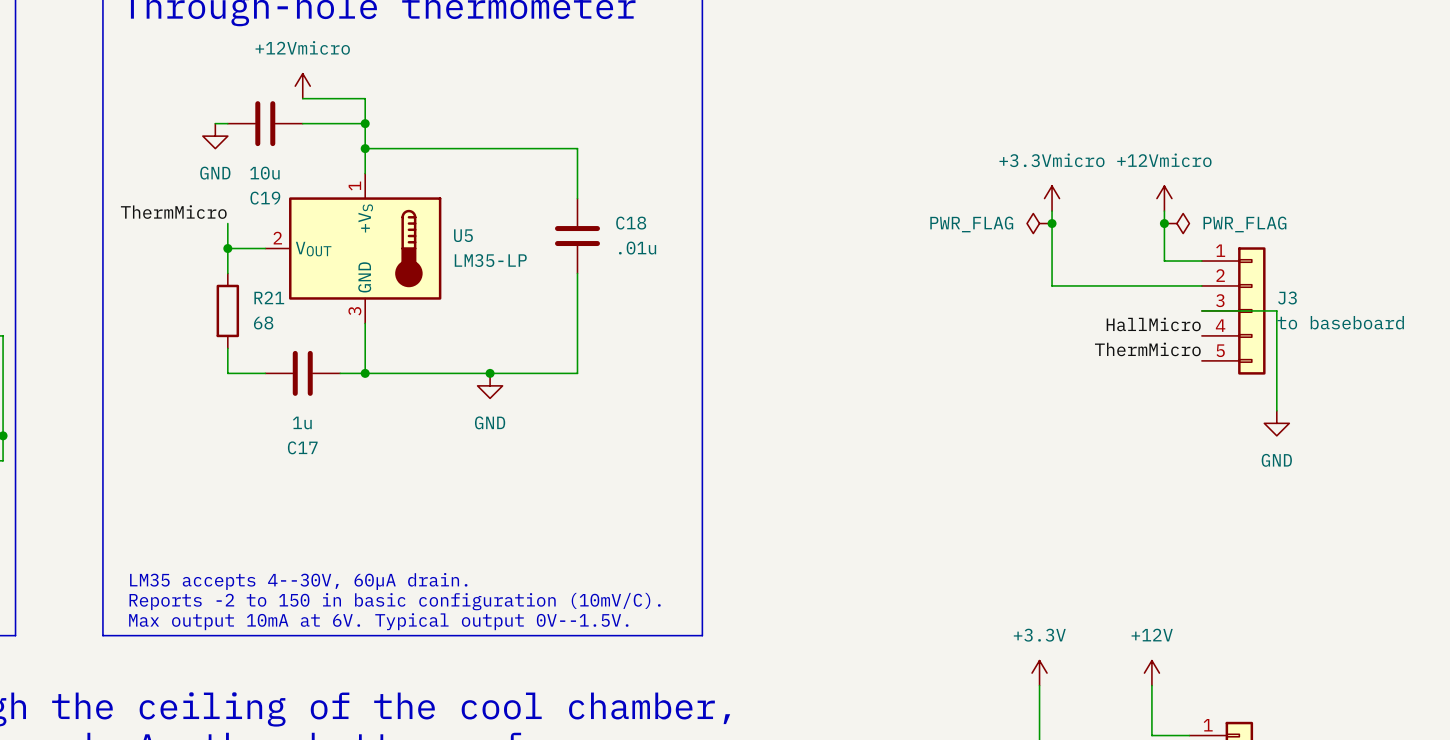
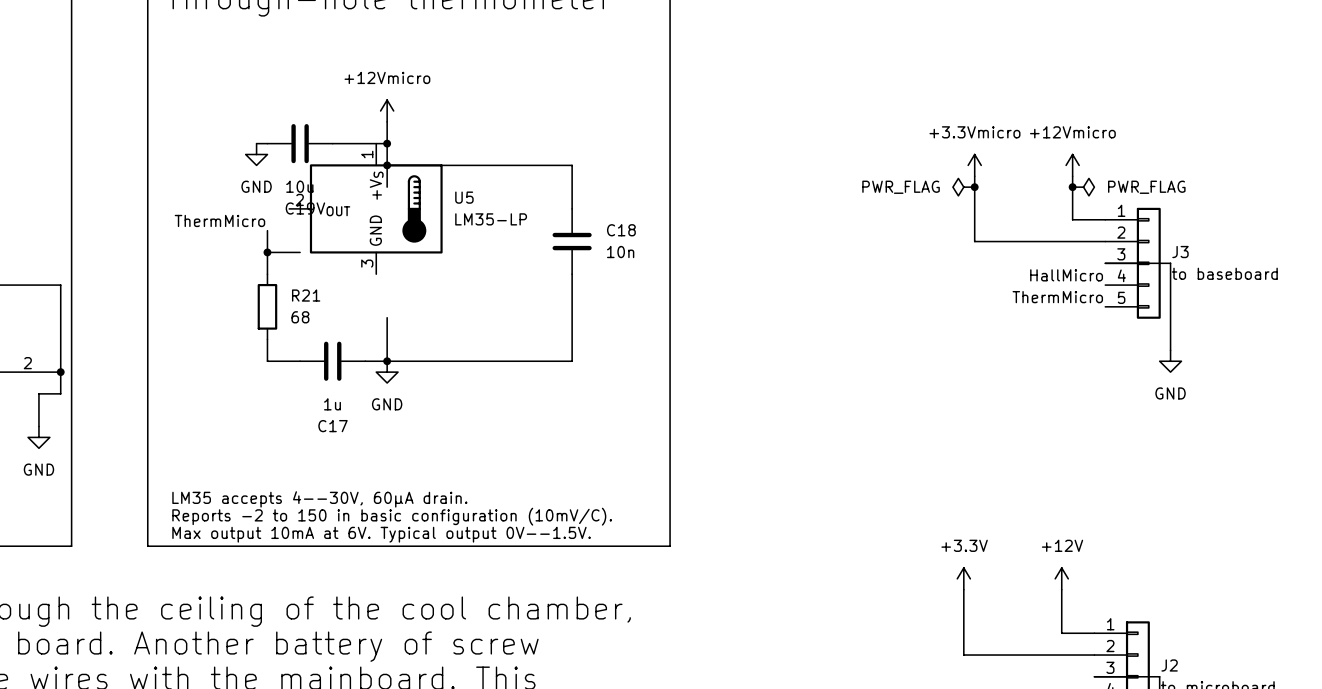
power symbol position: +12Vmicro (302, 86) -> +12Vmicro (387, 110)
wire: (302, 98) (365, 98) (365, 173) -> none
wire: (215, 123) (227, 123) -> (256, 143) (267, 143)
C19 position: (265, 123) -> (300, 143)
wire: (302, 123) (365, 123) -> (332, 143) (387, 143)
junction: (365, 123) -> none
power symbol position: GND (215, 136) -> GND (256, 154)
wire: (365, 148) (577, 148) (577, 198) -> (387, 165) (572, 165) (572, 208)
junction: (365, 148) -> none
wire: none -> (387, 121) (387, 187)
junction: none -> (387, 143)
junction: none -> (387, 165)
label position: ThermMicro (173, 212) -> ThermMicro (219, 220)
wire: (227, 223) (227, 273) -> (267, 230) (267, 274)
C18 position: (577, 236) -> (572, 241)
wire: (227, 248) (265, 248) -> (267, 252) (300, 252)
junction position: (227, 248) -> (267, 252)
C18 value: .01u (637, 248) -> 10n (620, 252)
wire: (577, 273) (577, 373) (340, 373) -> (572, 274) (572, 361) (365, 361)
R21 position: (227, 310) -> (267, 306)
wire: (365, 323) (365, 373) -> (387, 317) (387, 361)
wire: (227, 348) (227, 373) (265, 373) -> (267, 339) (267, 361) (300, 361)
C17 position: (302, 373) -> (332, 361)
junction position: (365, 373) -> (387, 361)
junction: (490, 373) -> none
power symbol position: GND (490, 385) -> GND (387, 372)

